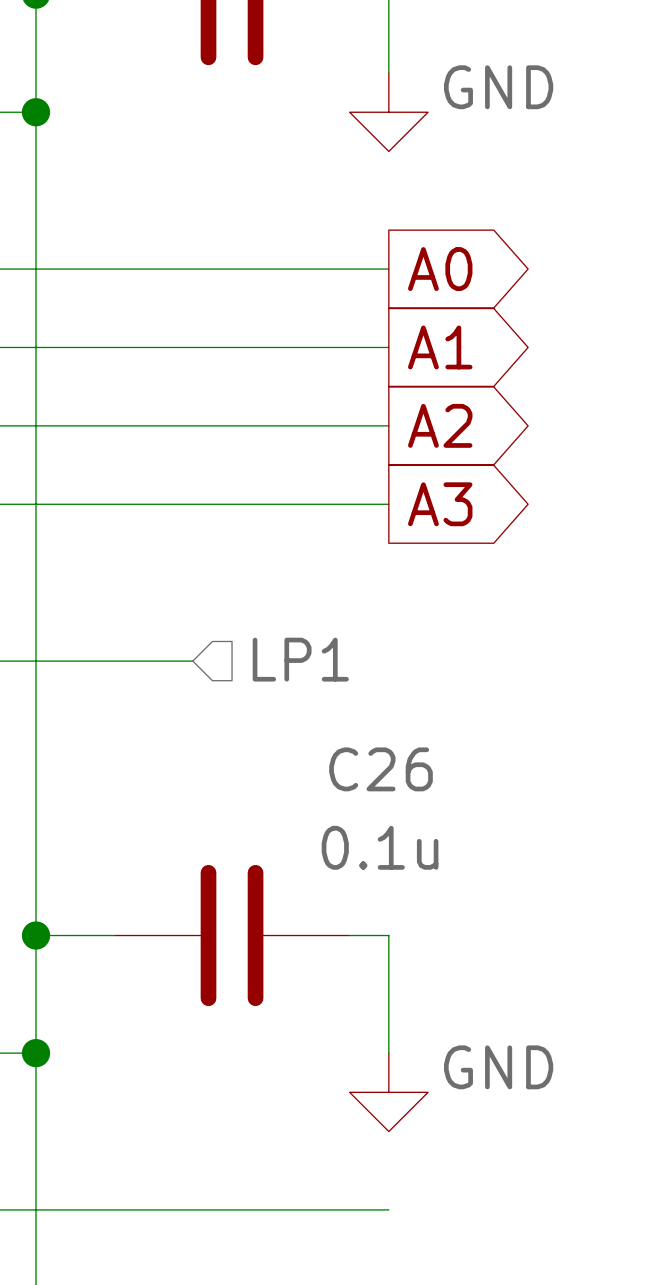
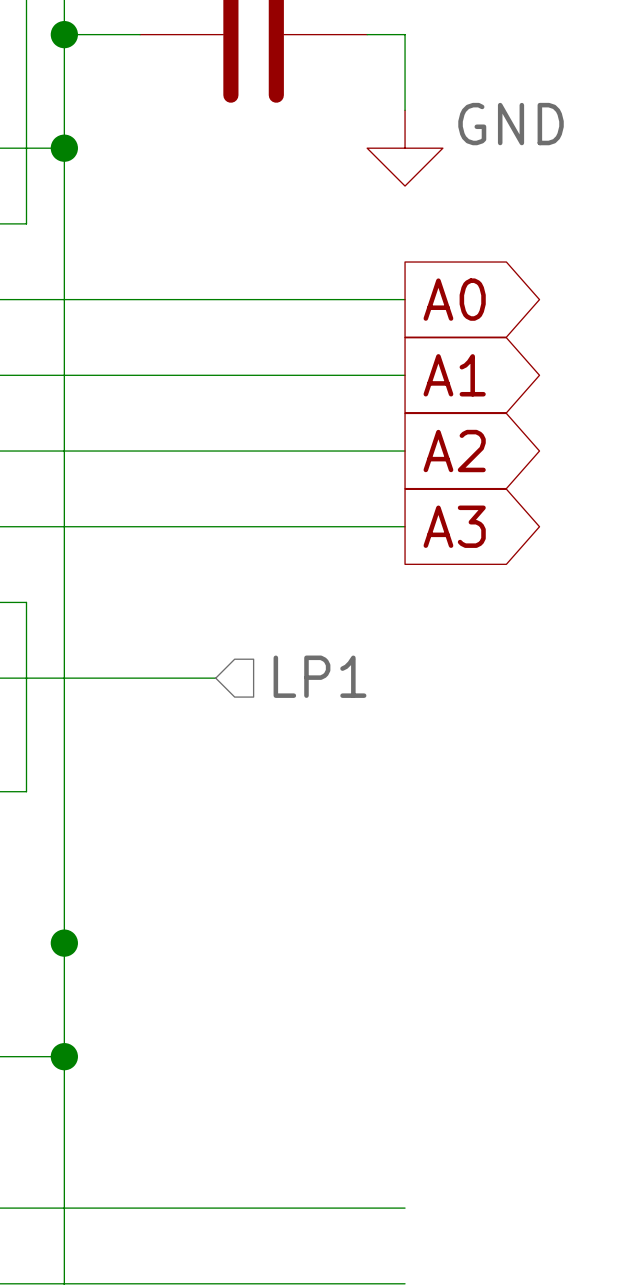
wire: (36, 935) (114, 935) -> none
C26: 0.1u (232, 935) -> none
wire: (349, 935) (388, 935) (388, 1053) -> none
power symbol: GND (388, 1092) -> none

